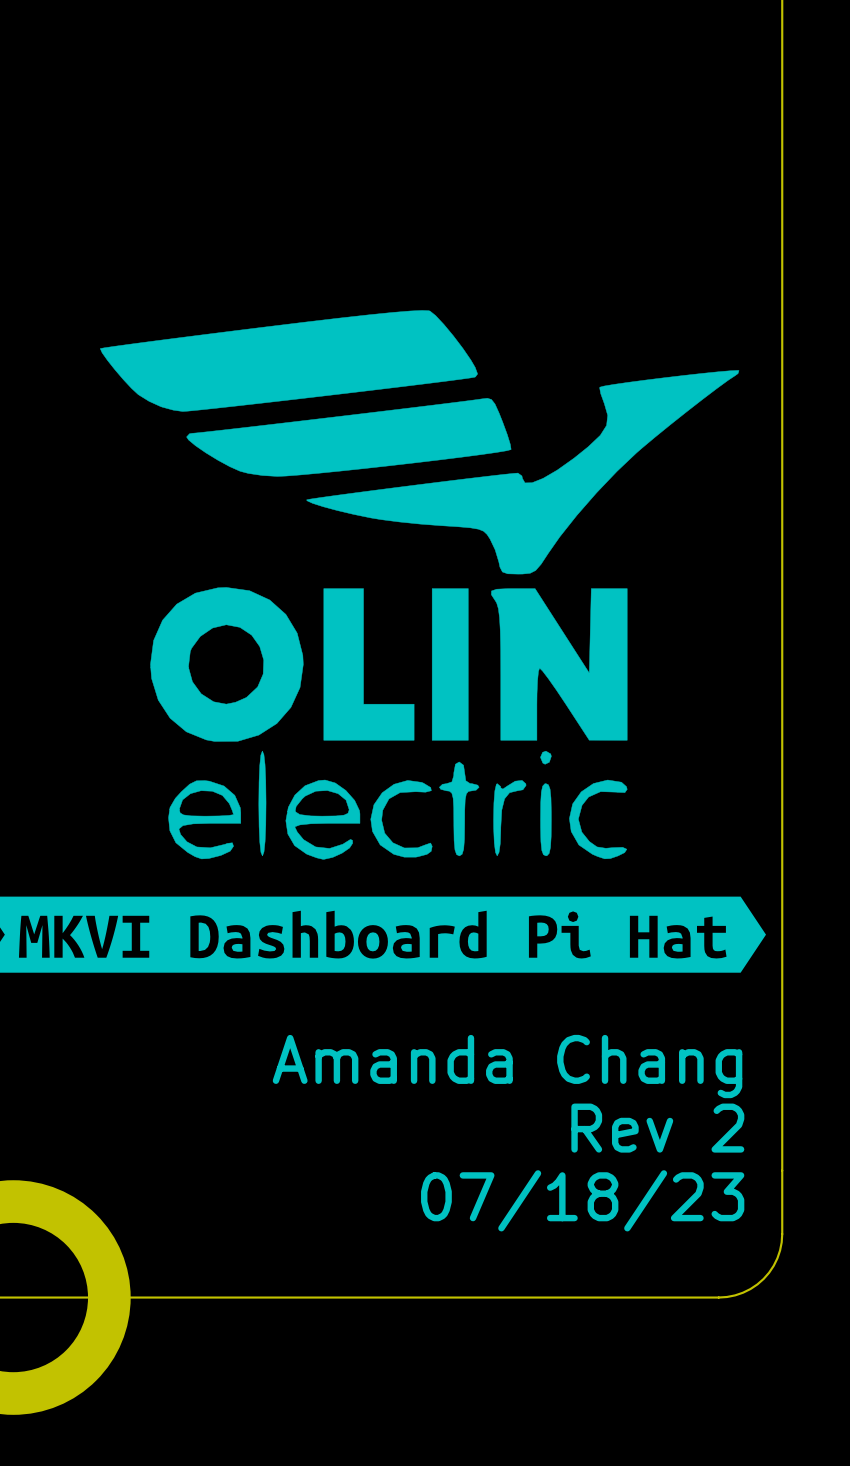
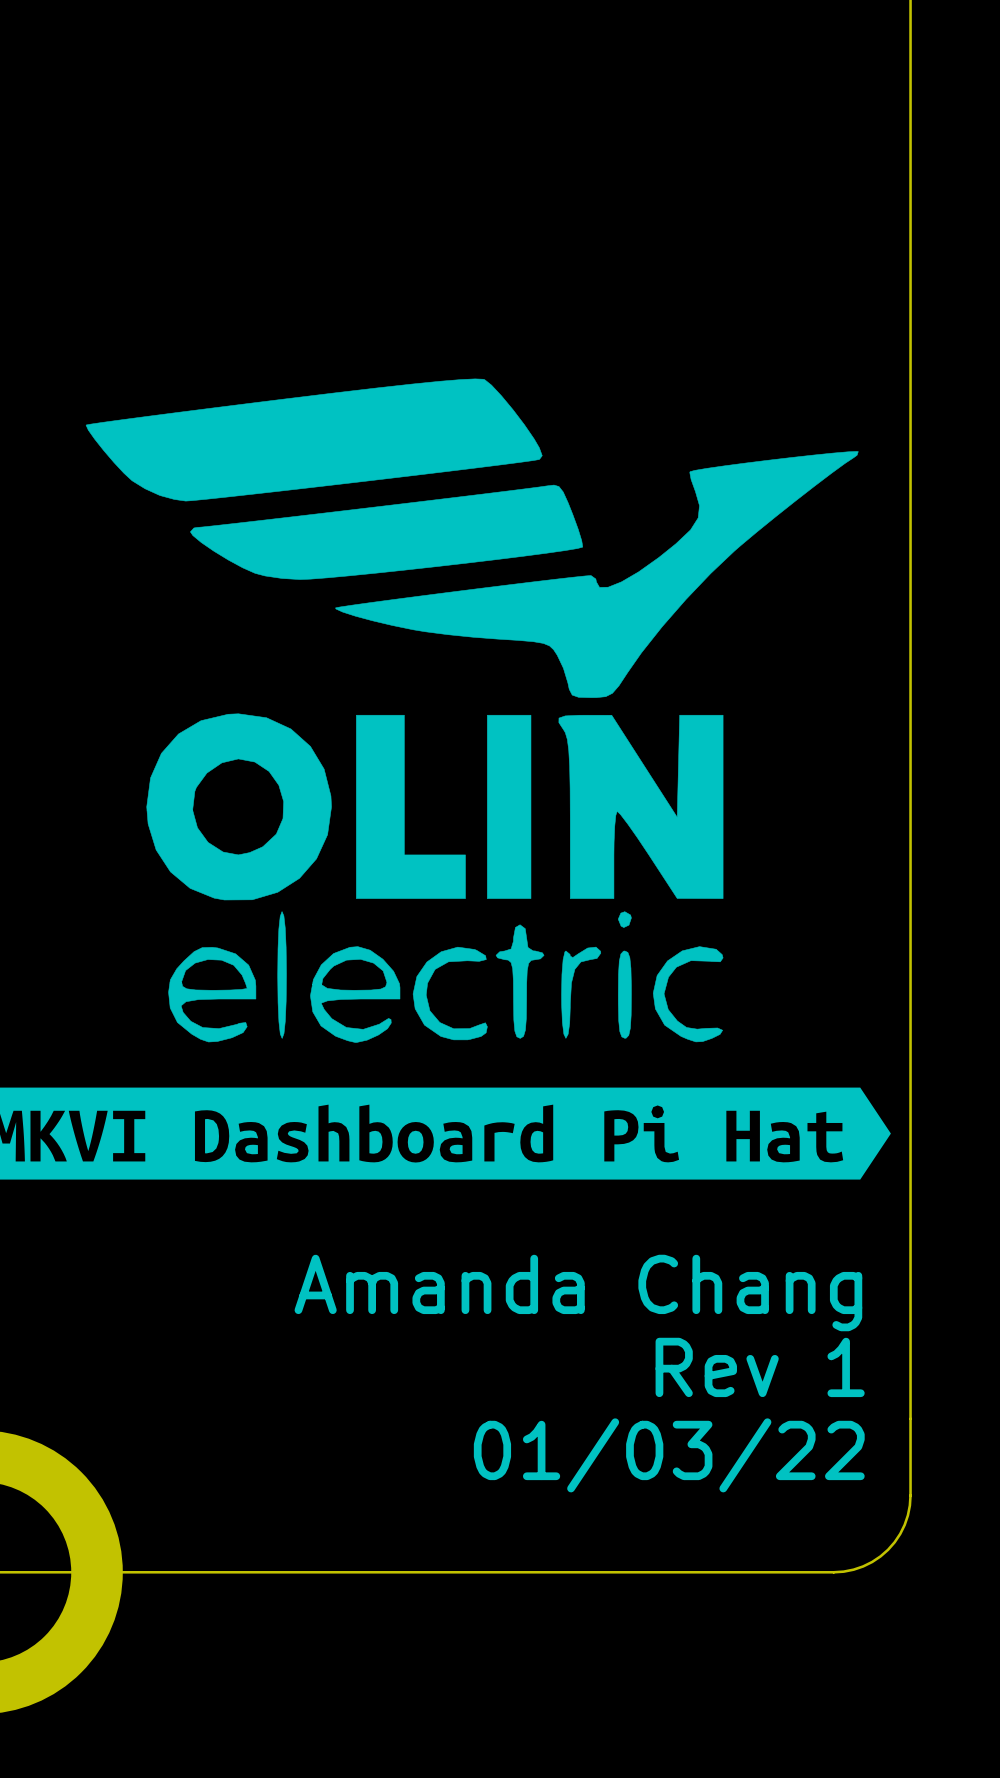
text: Rev 2 (657, 1128) -> Rev 1 (760, 1367)
text: 07/18/23 (582, 1200) -> 01/03/22 (669, 1455)

